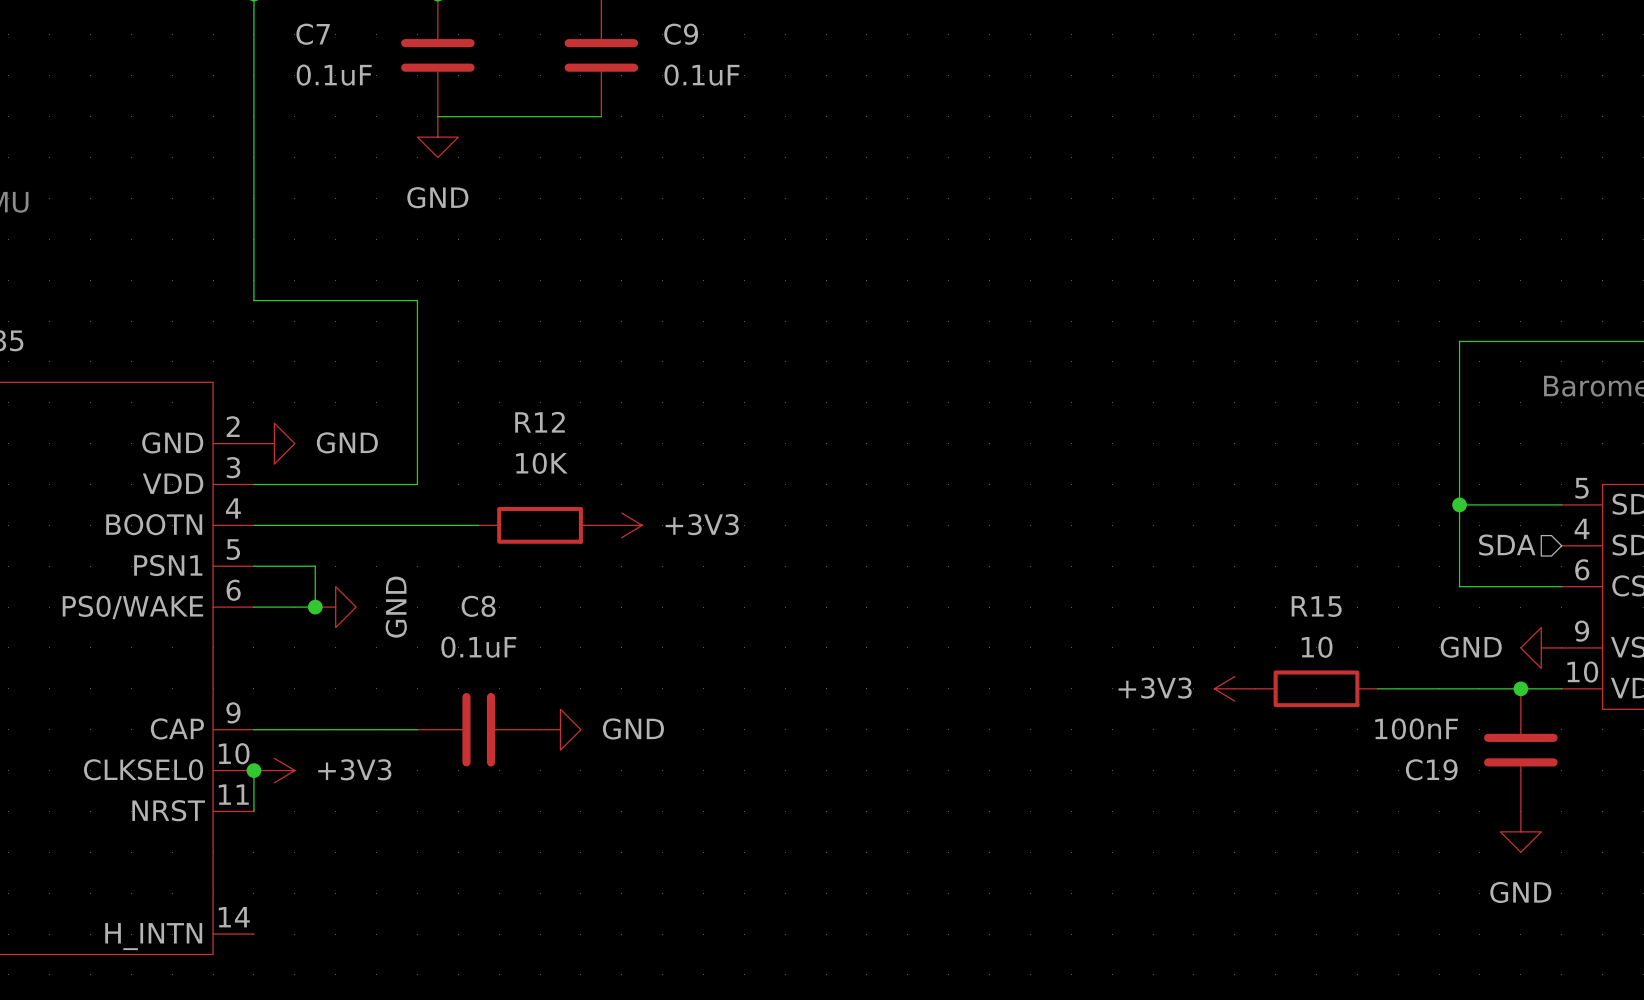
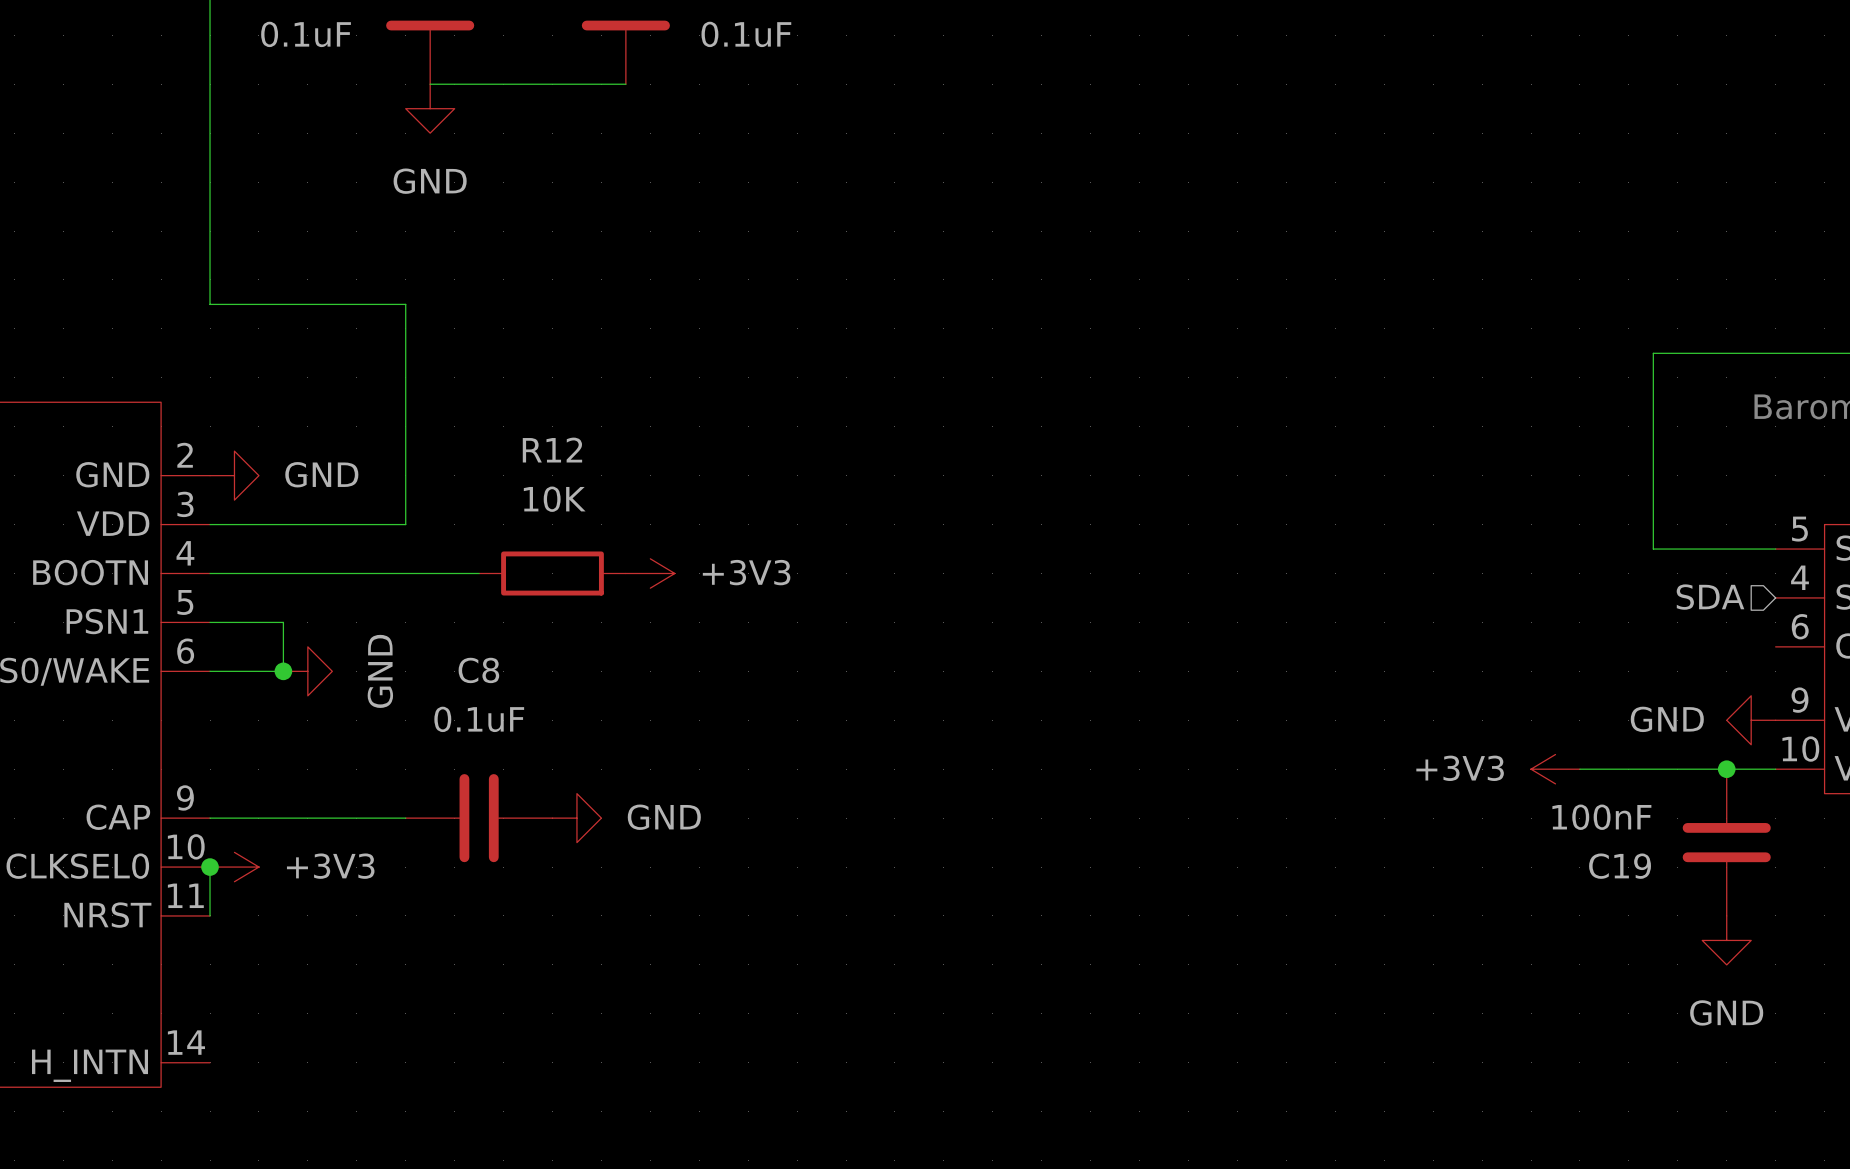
wire: (1459, 504) (1459, 586) (1561, 586) -> none
junction: (1459, 504) -> none
power symbol position: +3V3 (1234, 688) -> +3V3 (1555, 769)
R15: 10 (1316, 688) -> none

